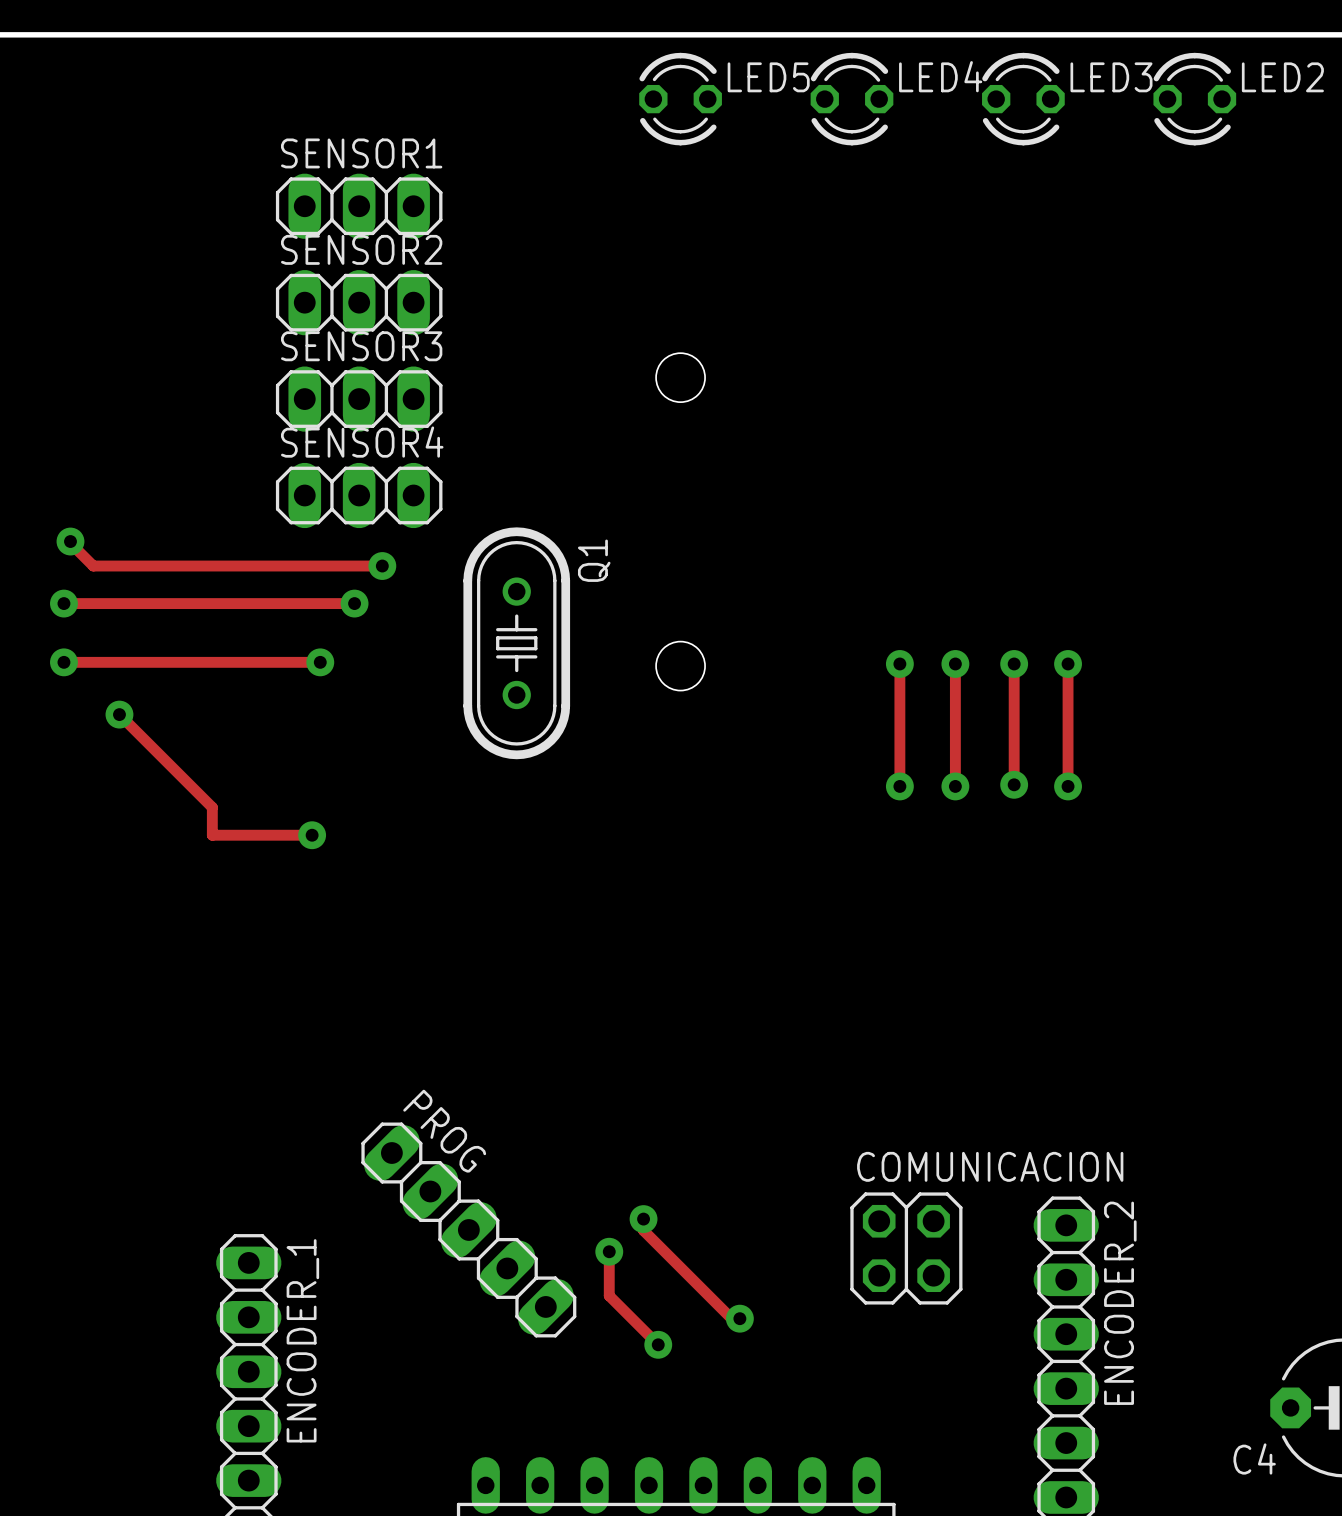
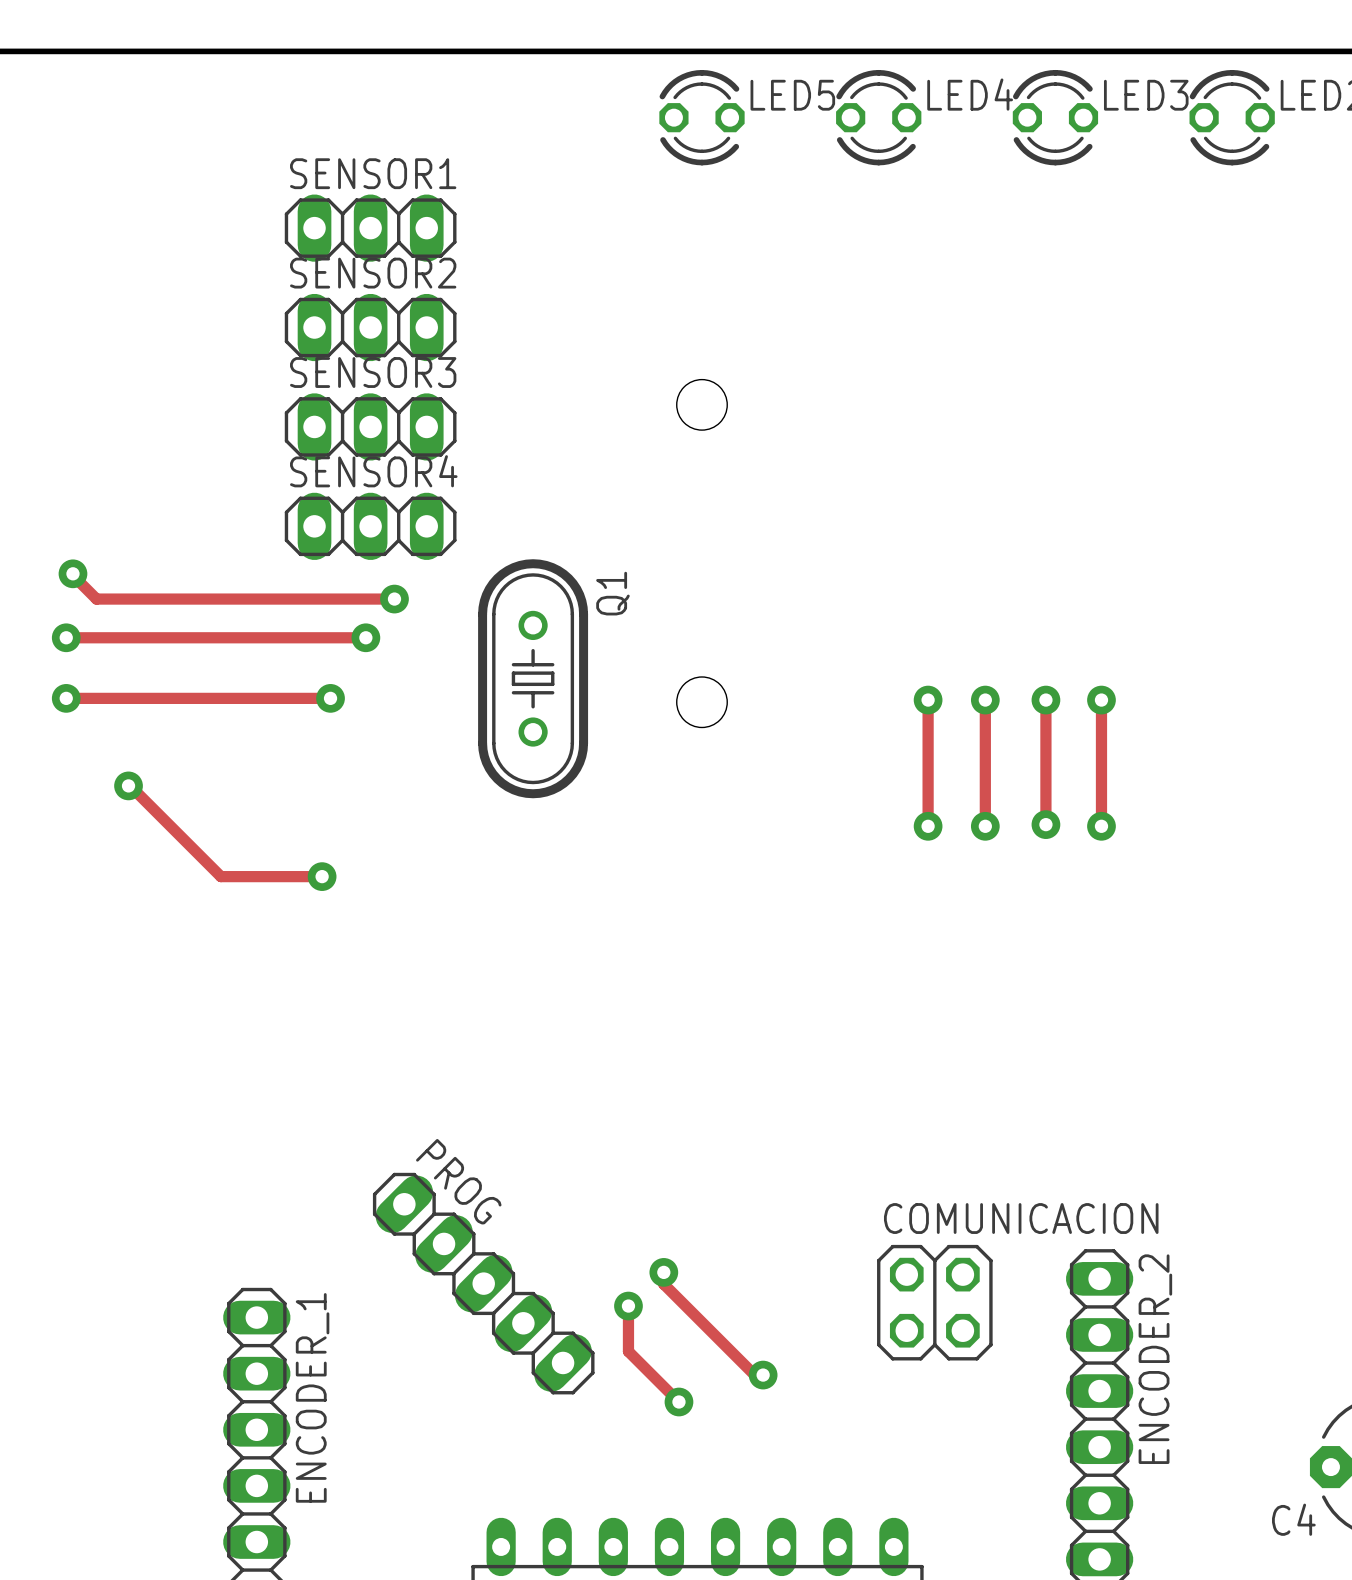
track: (119, 714) (212, 807) (212, 835) (213, 835) -> (128, 785) (220, 876)
via position: (119, 714) -> (128, 785)

